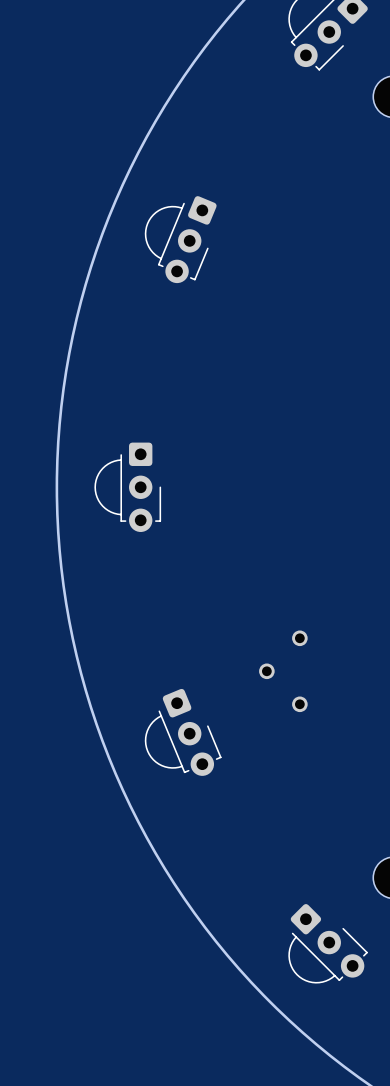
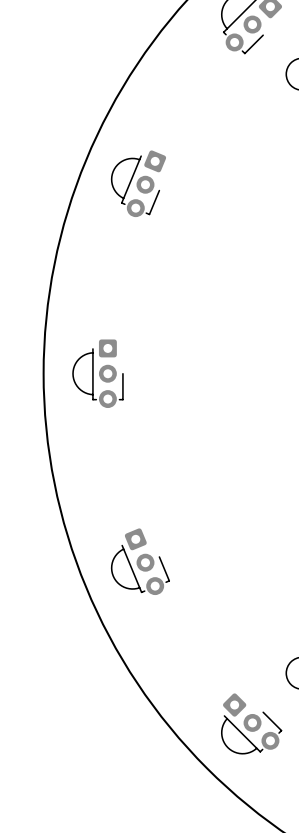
part: (283, 671) -> none

